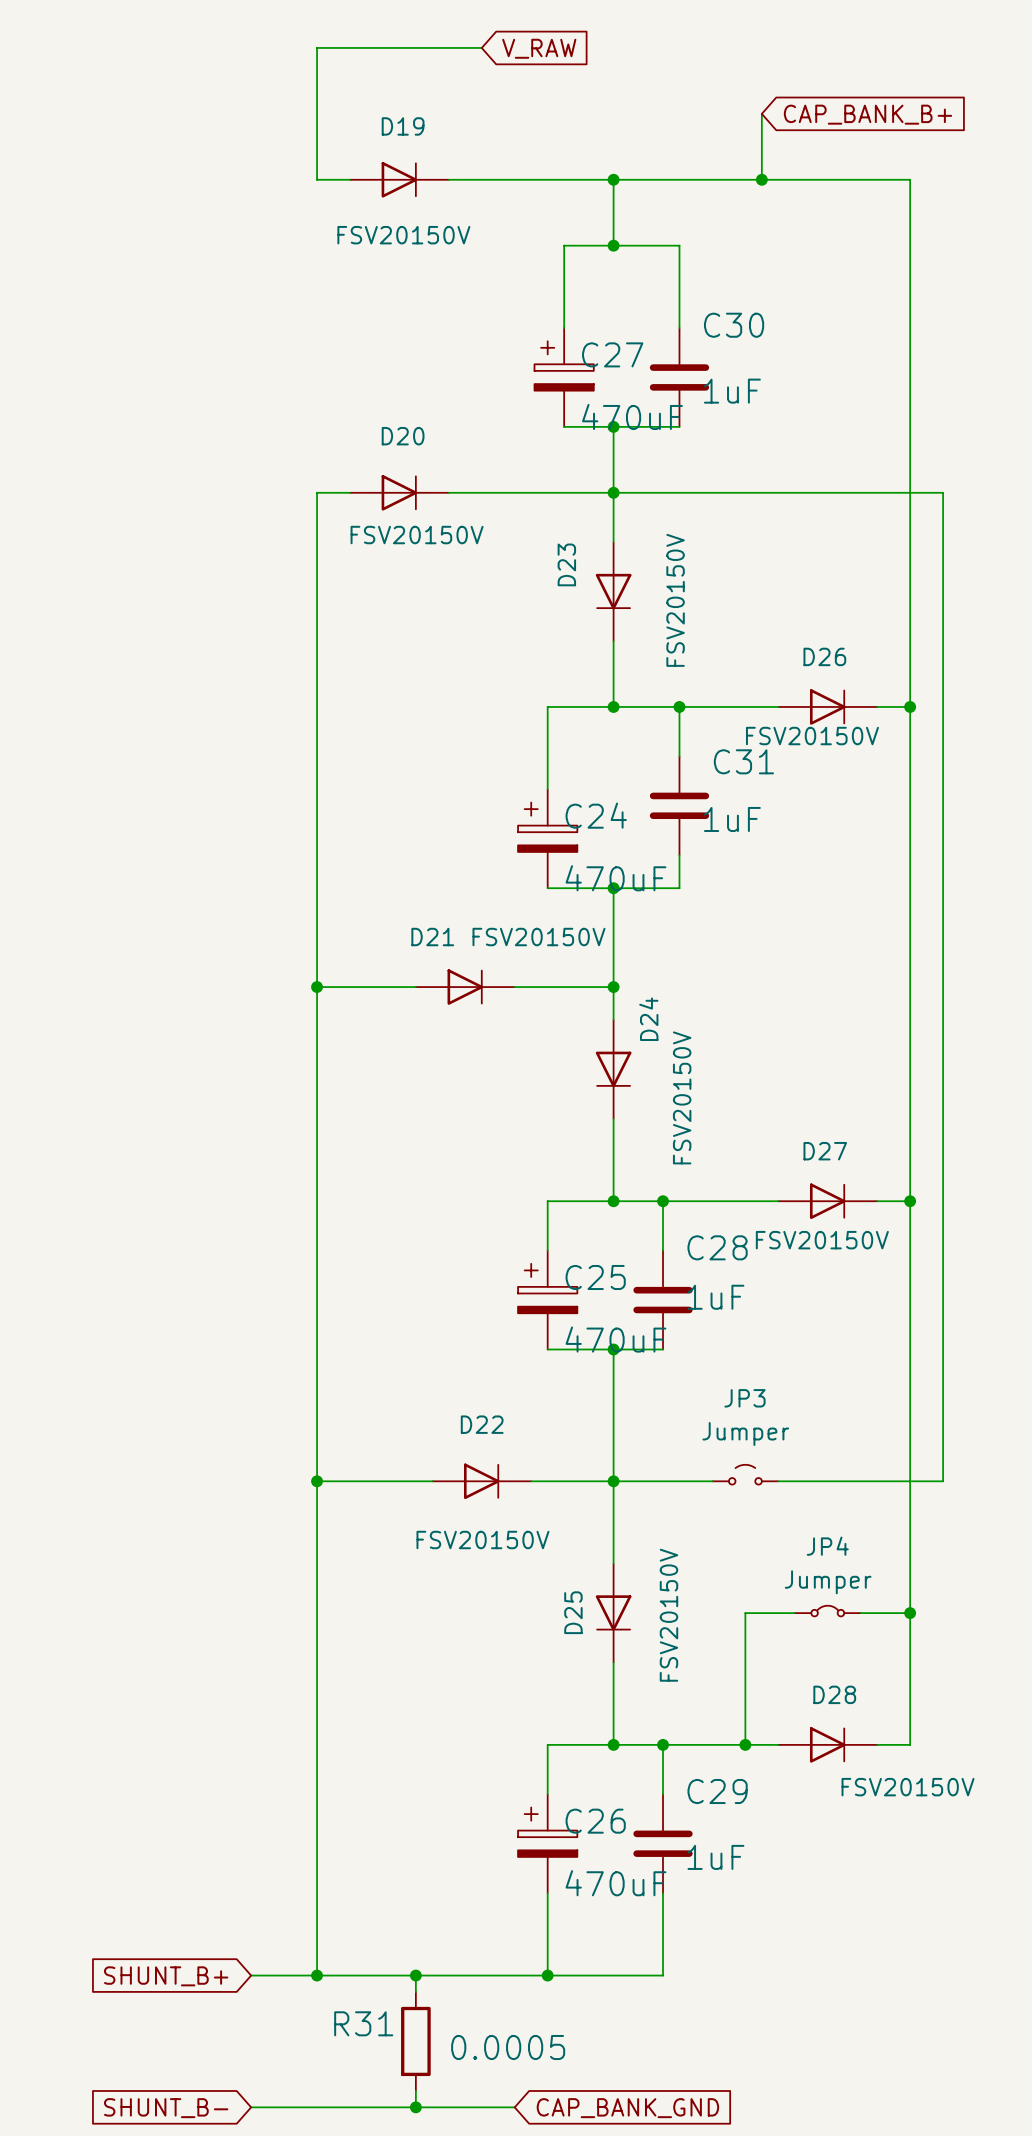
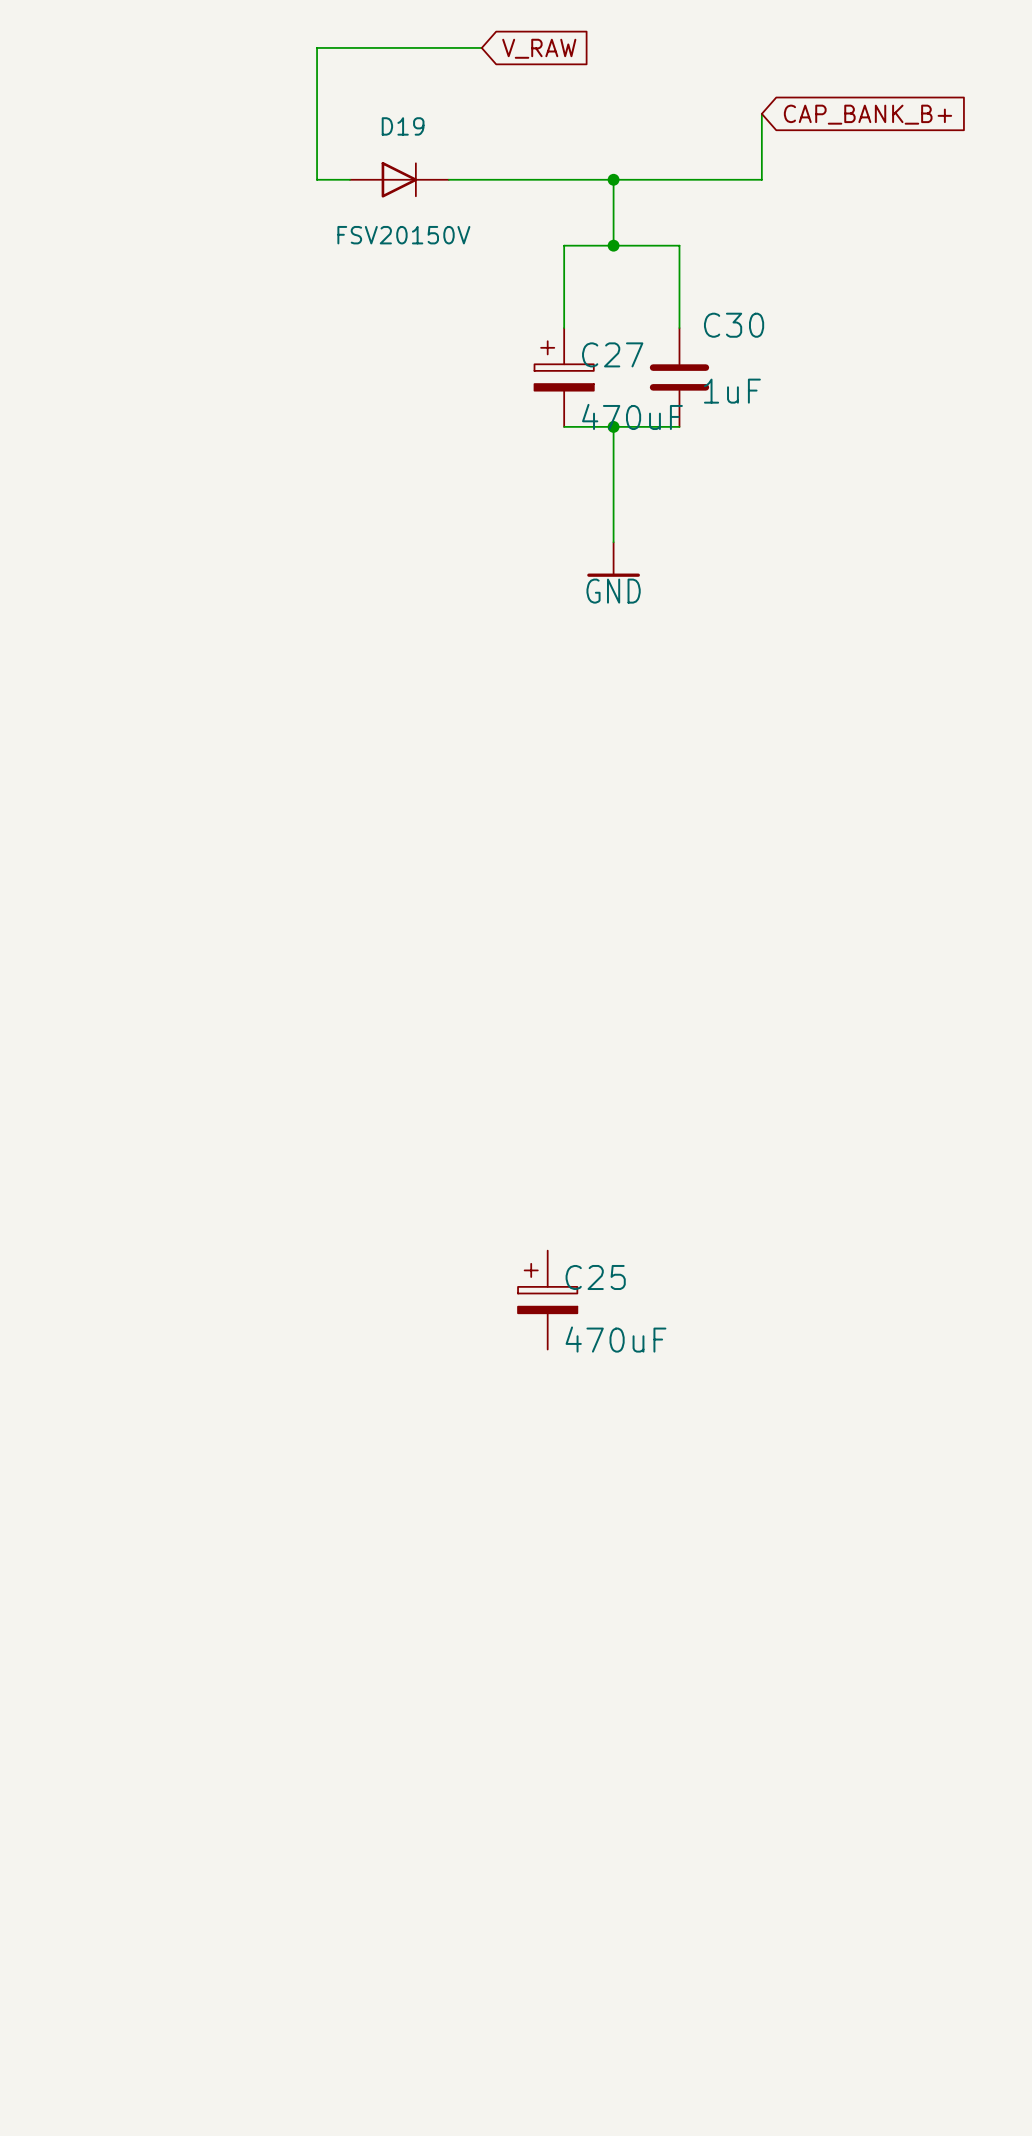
wire: (761, 179) (910, 179) (910, 1744) (877, 1744) -> none
junction: (761, 179) -> none
wire: (349, 492) (317, 492) (317, 1975) -> none
D20: FSV20150V (399, 492) -> none
wire: (448, 492) (943, 492) (943, 1481) (778, 1481) -> none
junction: (613, 492) -> none
power symbol: none -> GND (613, 559)
D23: FSV20150V (613, 591) -> none
wire: (613, 641) (613, 706) -> none
junction: (613, 706) -> none
wire: (679, 706) (679, 756) -> none
junction: (679, 706) -> none
wire: (778, 706) (547, 706) (547, 789) -> none
D26: FSV20150V (827, 706) -> none
wire: (877, 706) (910, 706) -> none
junction: (910, 706) -> none
C31: 1uF (679, 805) -> none
C24: 470uF (547, 838) -> none
wire: (679, 855) (679, 888) (547, 888) -> none
wire: (613, 888) (613, 1020) -> none
junction: (613, 888) -> none
wire: (317, 987) (415, 987) -> none
junction: (317, 987) -> none
D21: FSV20150V (465, 987) -> none
wire: (514, 987) (613, 987) -> none
junction: (613, 987) -> none
D24: FSV20150V (613, 1069) -> none
wire: (613, 1118) (613, 1201) -> none
junction: (613, 1201) -> none
wire: (663, 1201) (663, 1250) -> none
junction: (663, 1201) -> none
wire: (778, 1201) (547, 1201) (547, 1250) -> none
D27: FSV20150V (827, 1201) -> none
wire: (877, 1201) (910, 1201) -> none
junction: (910, 1201) -> none
C28: 1uF (663, 1300) -> none
wire: (547, 1349) (663, 1349) -> none
wire: (613, 1349) (613, 1563) -> none
junction: (613, 1349) -> none
JP3: Jumper (745, 1474) -> none
wire: (317, 1481) (432, 1481) -> none
junction: (317, 1481) -> none
D22: FSV20150V (481, 1481) -> none
wire: (531, 1481) (712, 1481) -> none
junction: (613, 1481) -> none
JP4: Jumper (827, 1611) -> none
D25: FSV20150V (613, 1613) -> none
wire: (794, 1613) (745, 1613) (745, 1744) -> none
wire: (860, 1613) (910, 1613) -> none
junction: (910, 1613) -> none
wire: (613, 1662) (613, 1744) -> none
junction: (613, 1744) -> none
wire: (663, 1744) (663, 1794) -> none
junction: (663, 1744) -> none
junction: (745, 1744) -> none
wire: (778, 1744) (547, 1744) (547, 1794) -> none
D28: FSV20150V (827, 1744) -> none
C26: 470uF (547, 1843) -> none
C29: 1uF (663, 1843) -> none
wire: (547, 1893) (547, 1975) -> none
wire: (663, 1893) (663, 1975) (251, 1975) -> none
junction: (317, 1975) -> none
wire: (415, 1975) (415, 1992) -> none
junction: (415, 1975) -> none
junction: (547, 1975) -> none
global label: SHUNT_B+ (166, 1976) -> none
R31: 0.0005 (415, 2041) -> none
wire: (415, 2090) (415, 2107) -> none
wire: (251, 2107) (514, 2107) -> none
junction: (415, 2107) -> none
global label: SHUNT_B- (166, 2108) -> none
global label: CAP_BANK_GND (627, 2108) -> none

